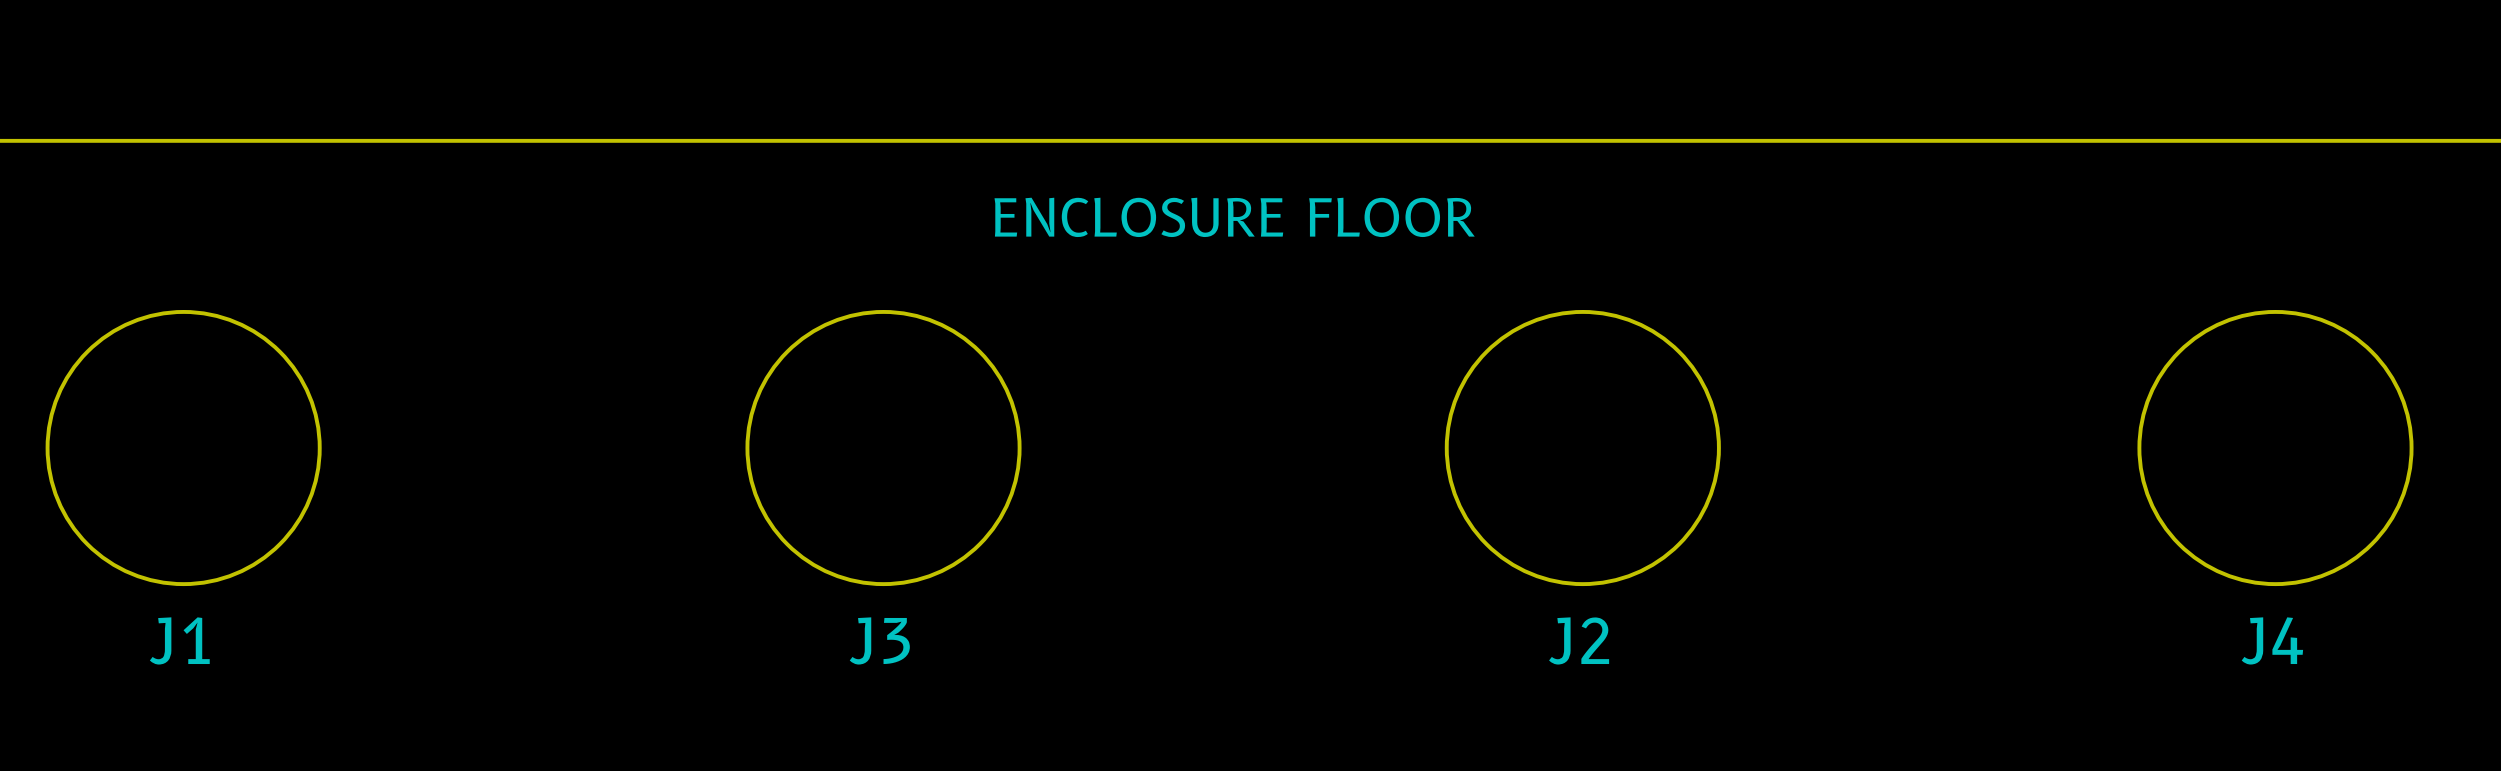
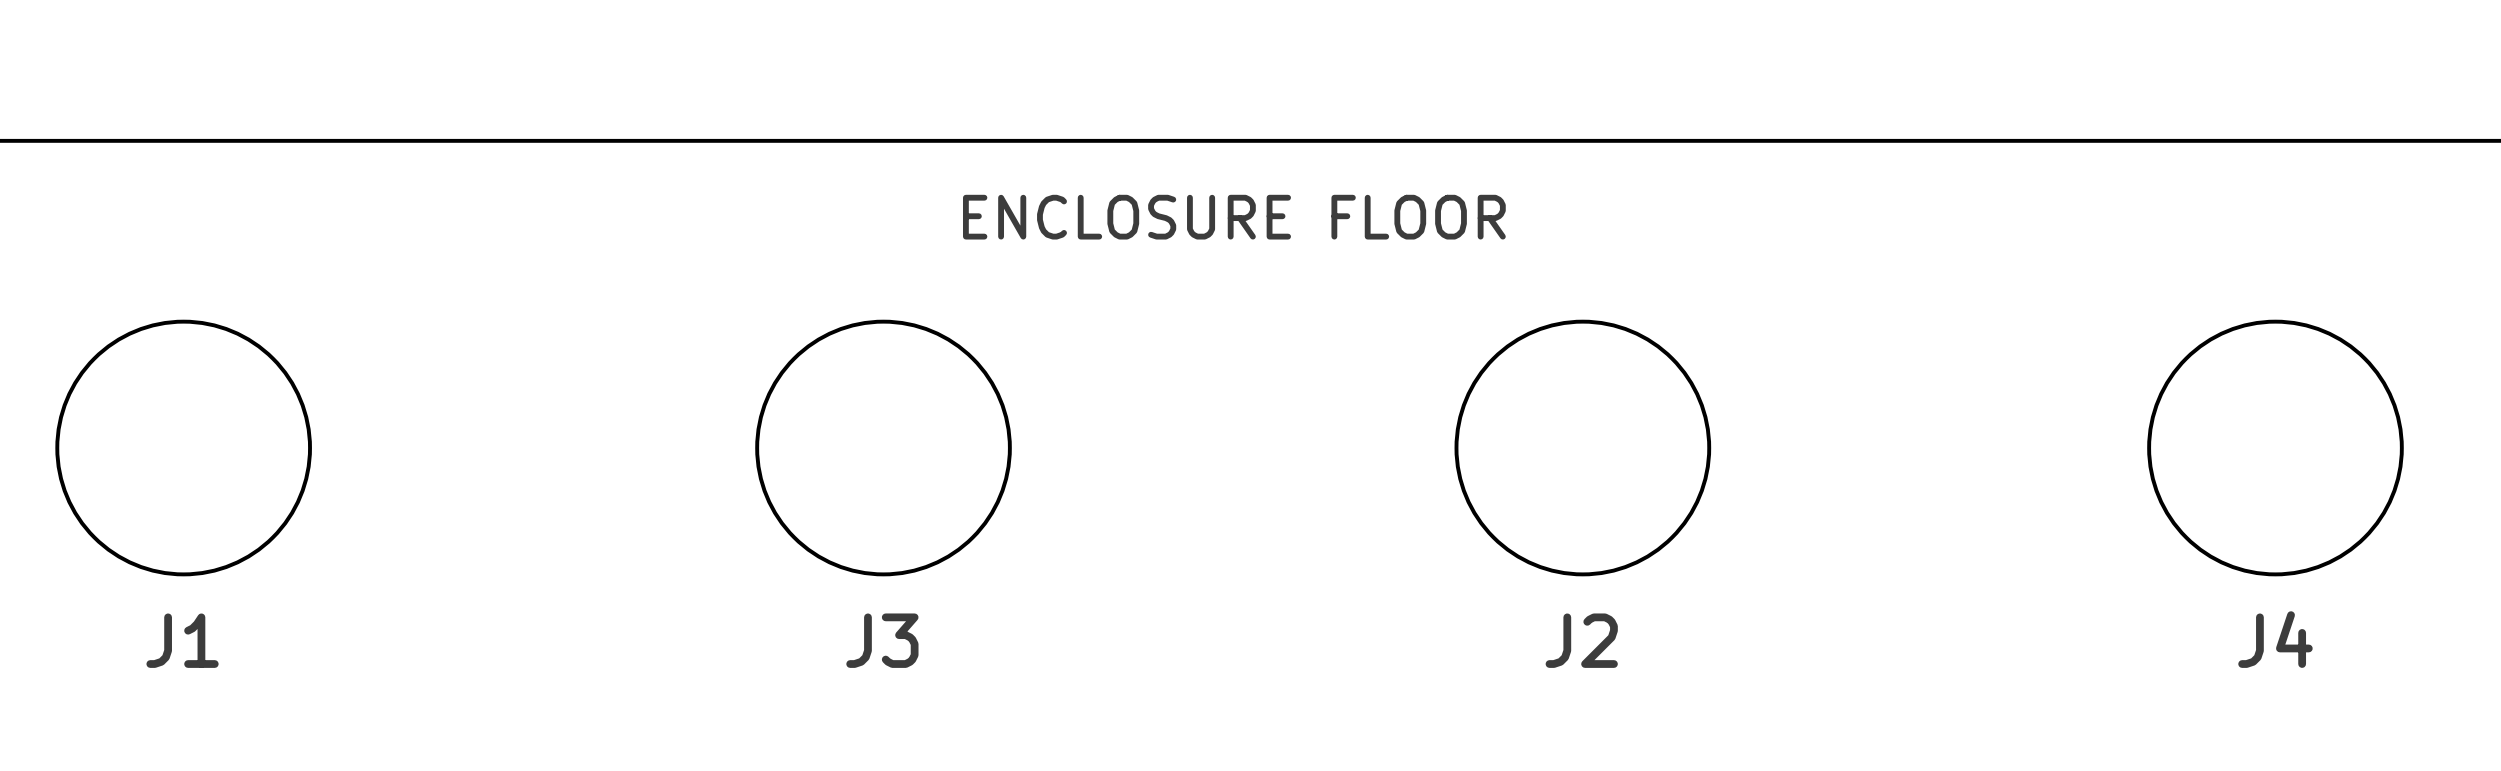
round board edge size: [45, 309, 322, 587] -> [55, 319, 312, 577]
round board edge size: [745, 309, 1022, 587] -> [755, 319, 1012, 577]
round board edge size: [1444, 309, 1721, 587] -> [1454, 319, 1712, 577]
round board edge size: [2137, 309, 2414, 587] -> [2147, 319, 2404, 577]

